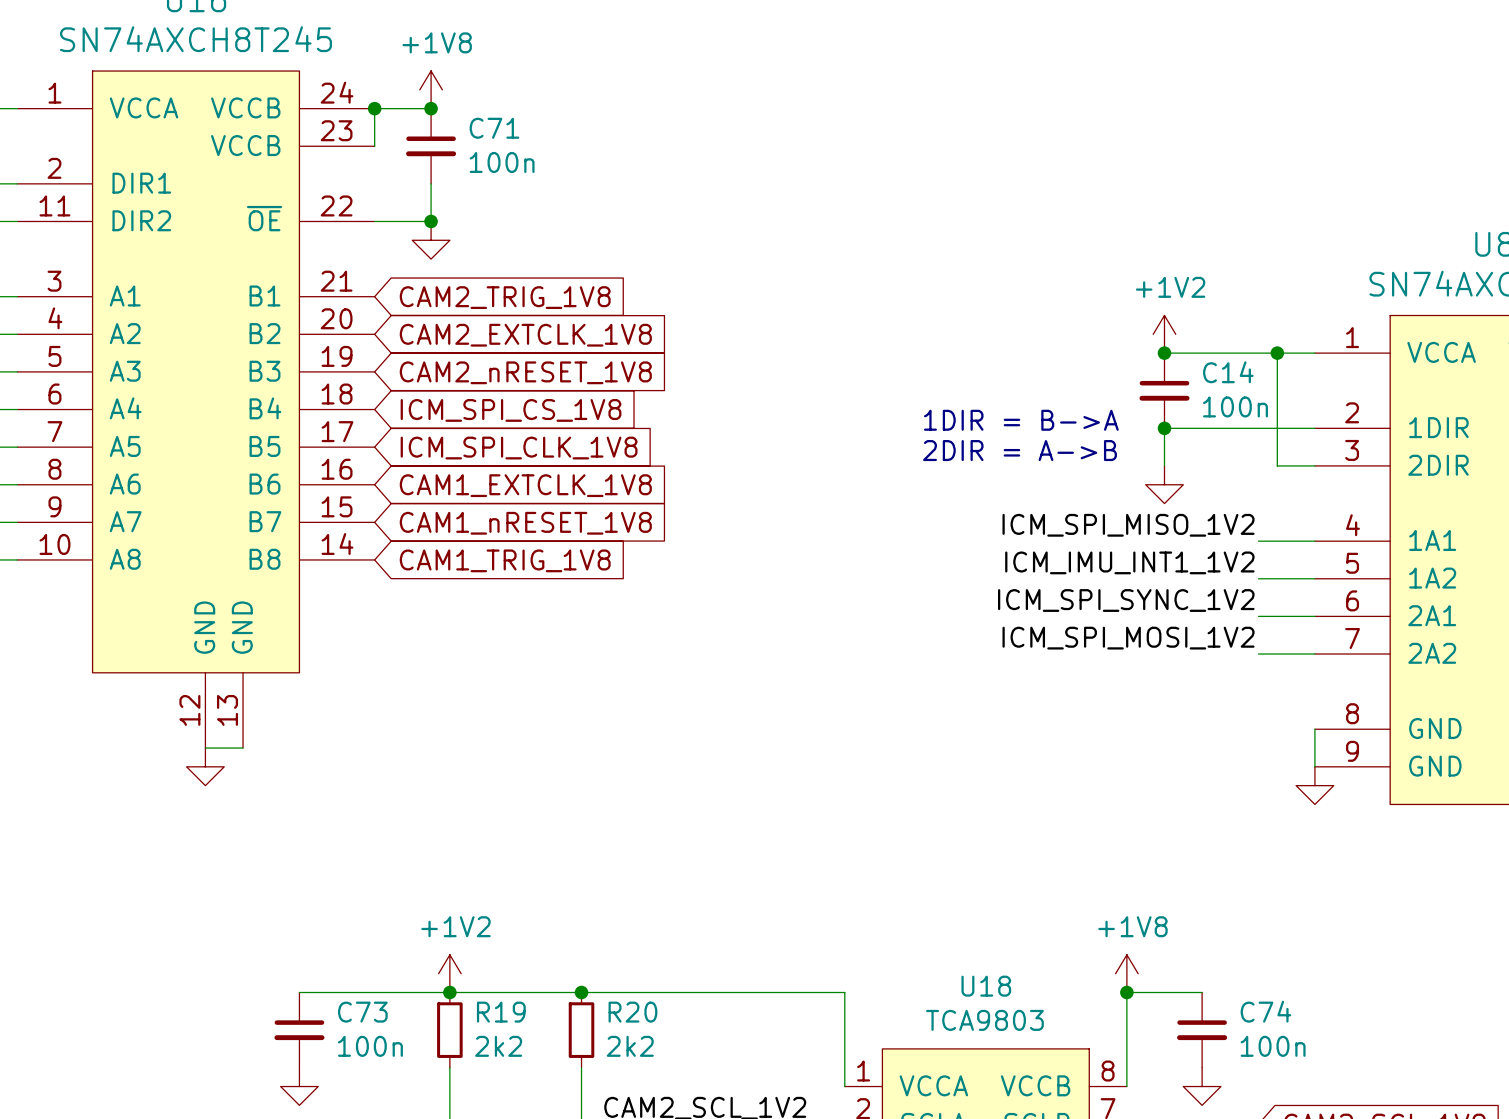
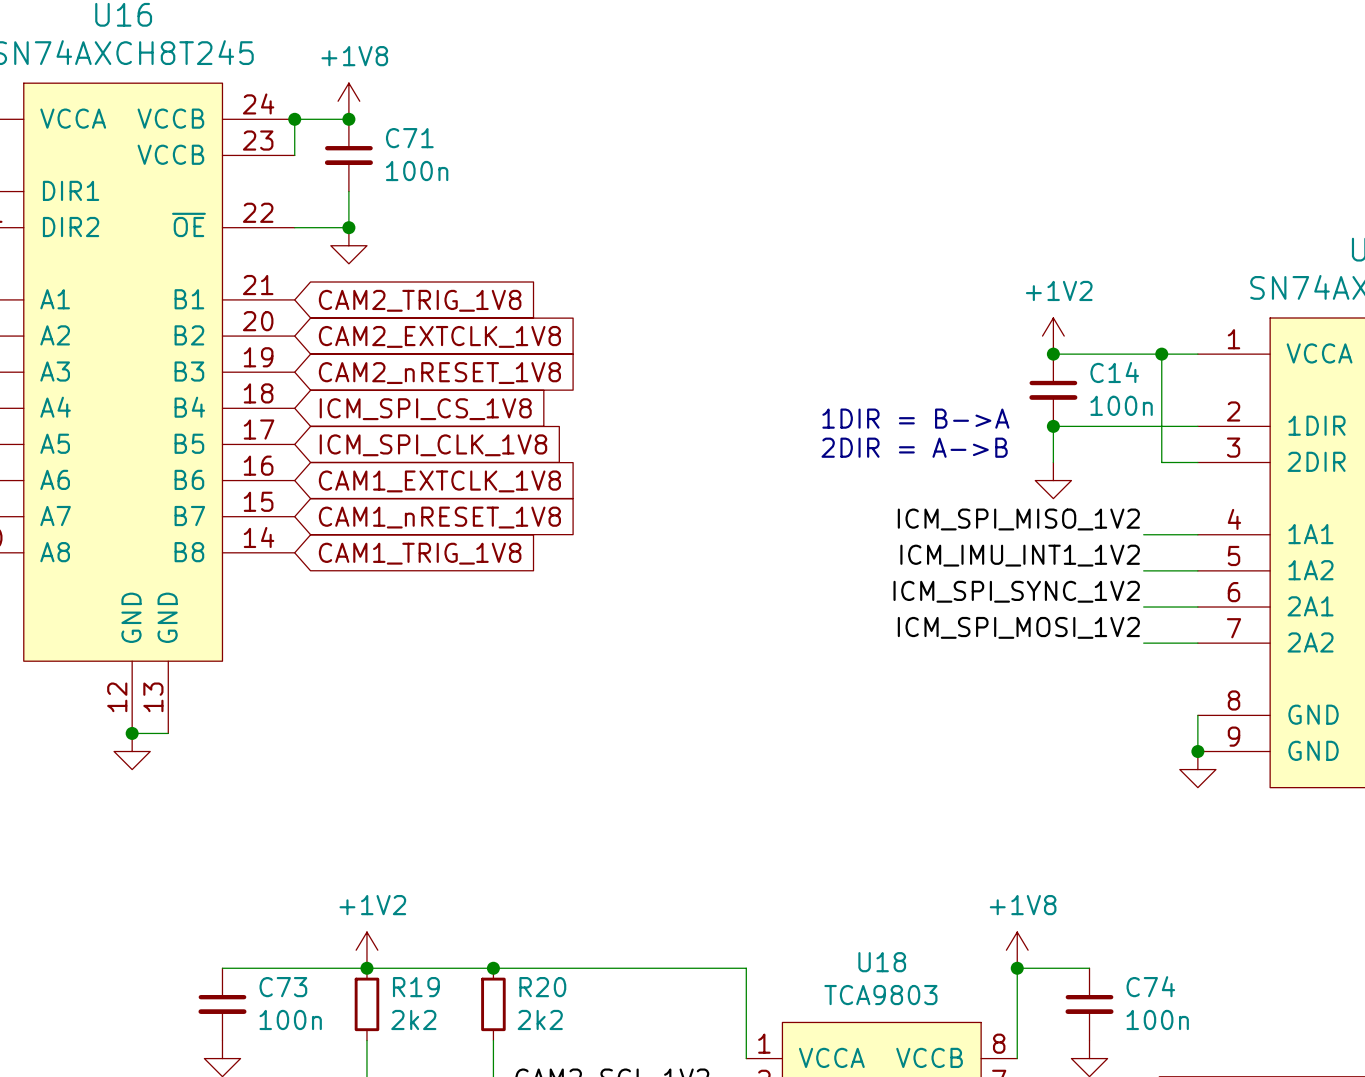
junction: none -> (132, 733)
junction: none -> (1197, 751)

